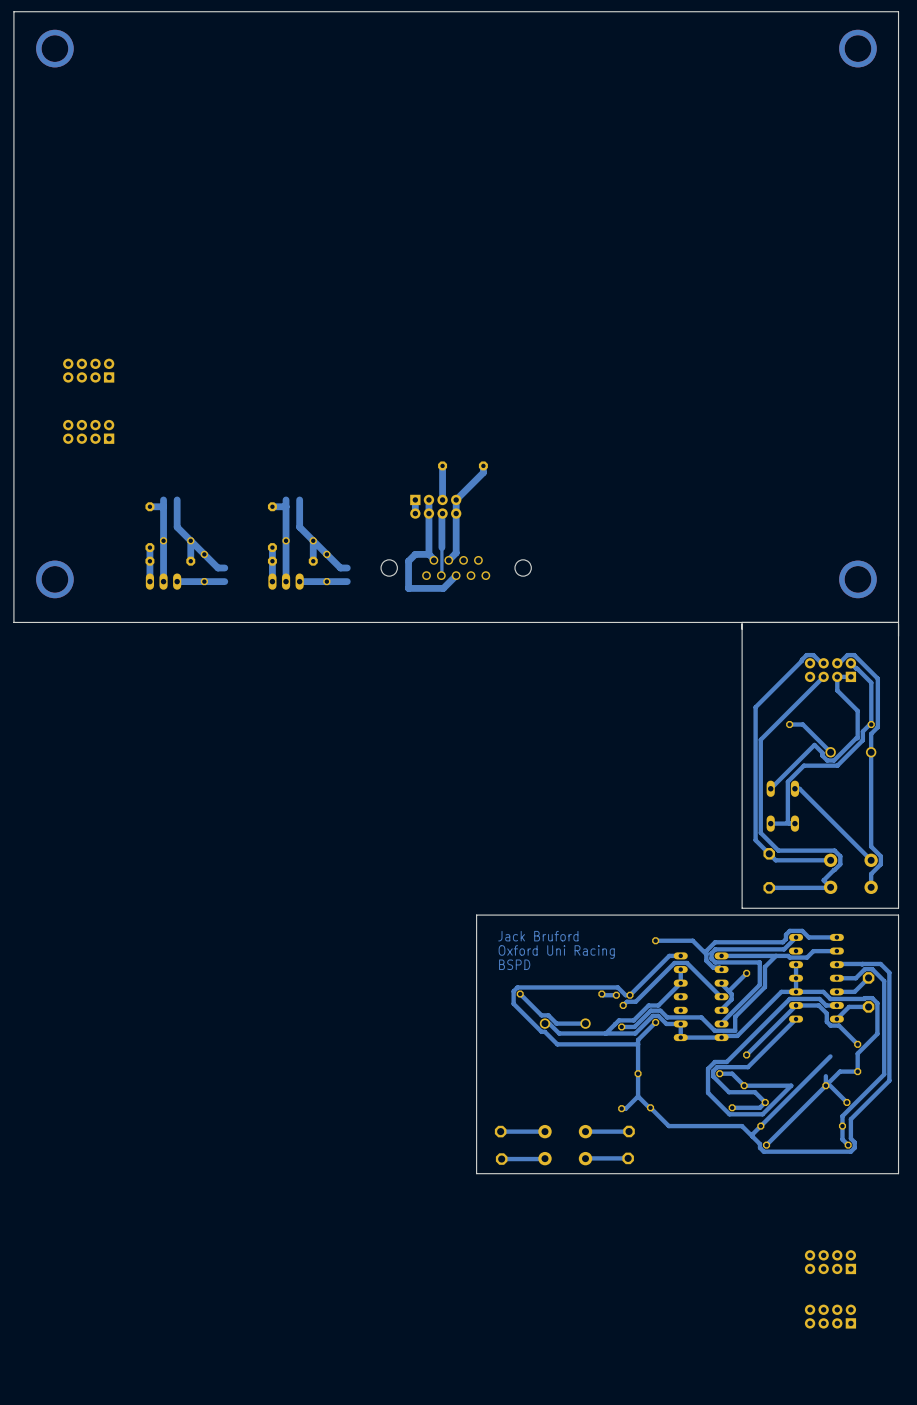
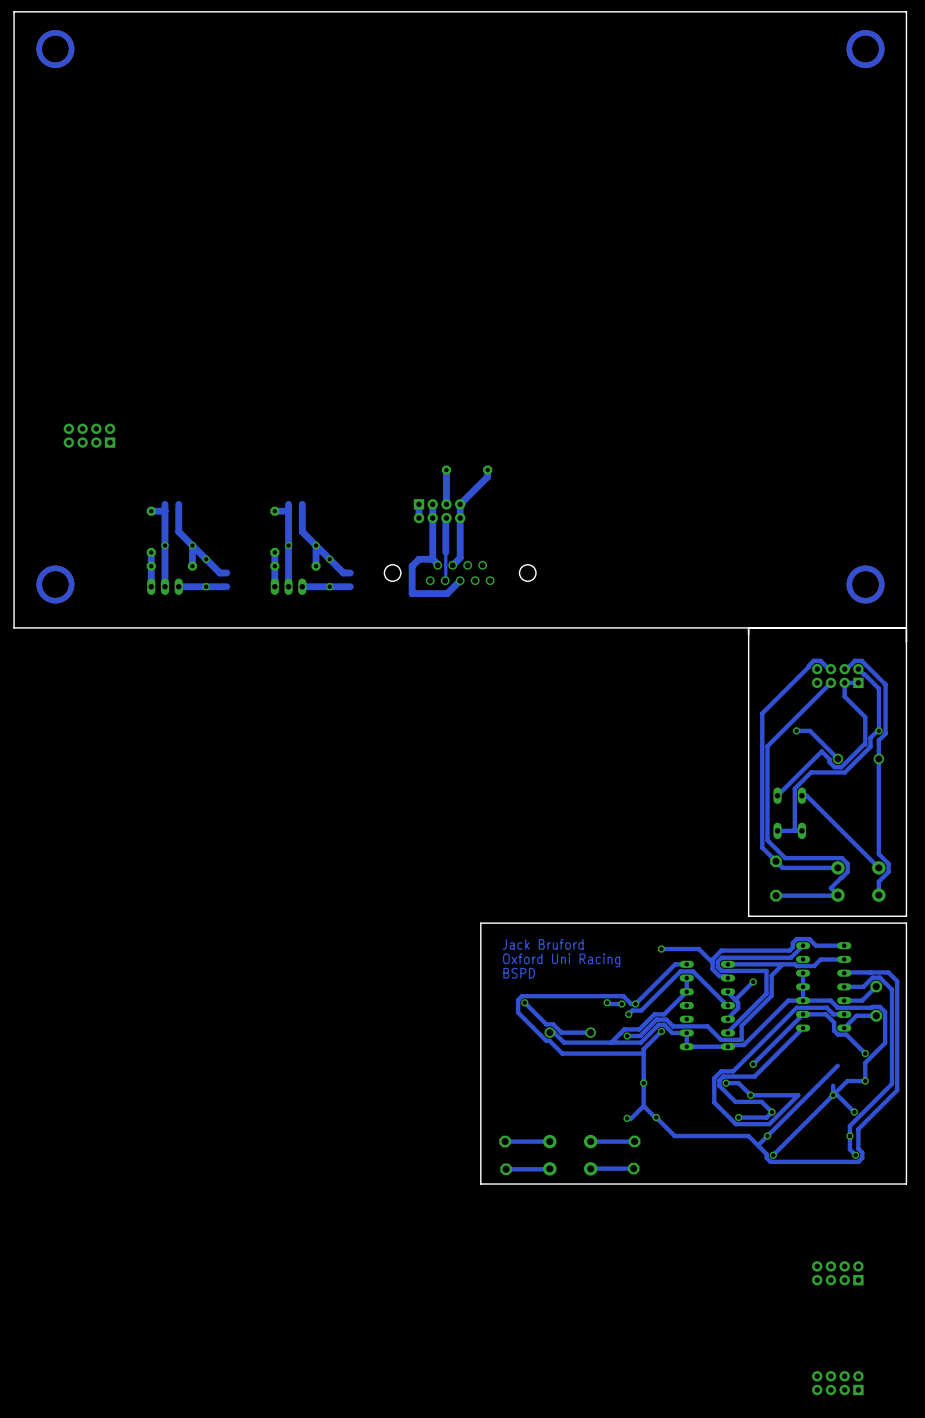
part: (88, 370) -> none
part position: (830, 1316) -> (837, 1383)

